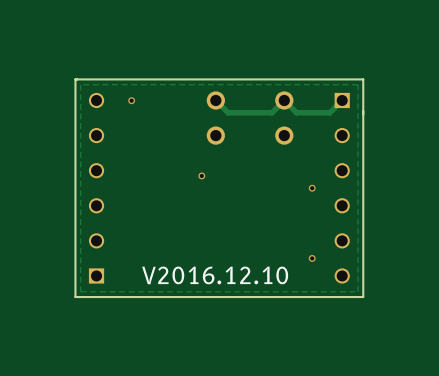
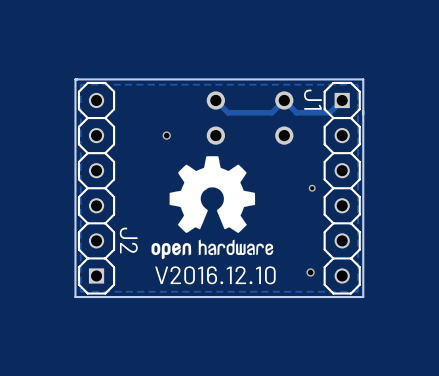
via: (131, 100) -> none
via: none -> (166, 135)
drawing: none -> [151, 156, 274, 260]
via: (201, 175) -> none
J2 side: top (96, 188) -> bottom (96, 188)
J1 side: top (342, 188) -> bottom (342, 188)
via: (312, 258) -> none
via: none -> (310, 272)

